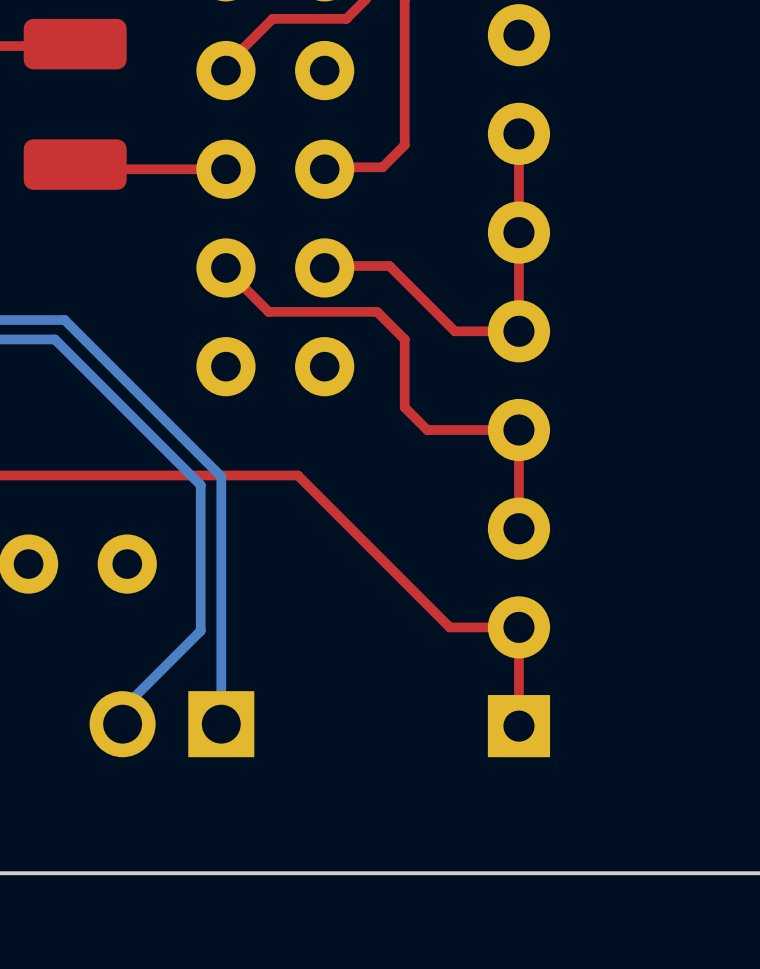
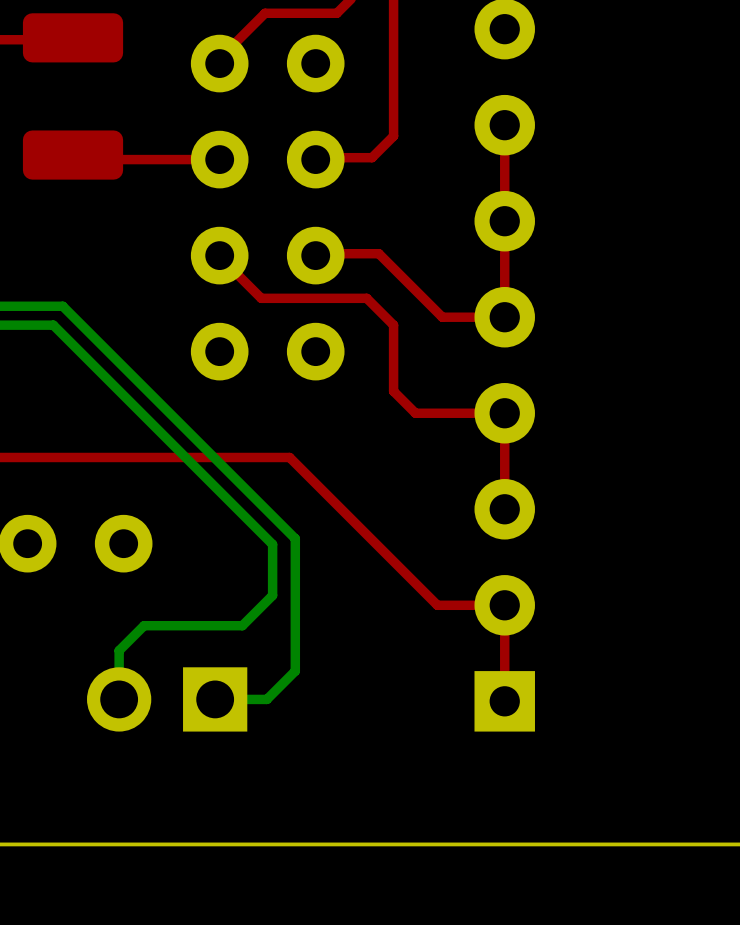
bottom track: (221, 476) (221, 724) -> (215, 458) (295, 538) (295, 671) (266, 699) (215, 699)
bottom track: (200, 485) (200, 630) (122, 709) -> (195, 466) (272, 544) (272, 595) (242, 625) (144, 625) (119, 650) (119, 684)

